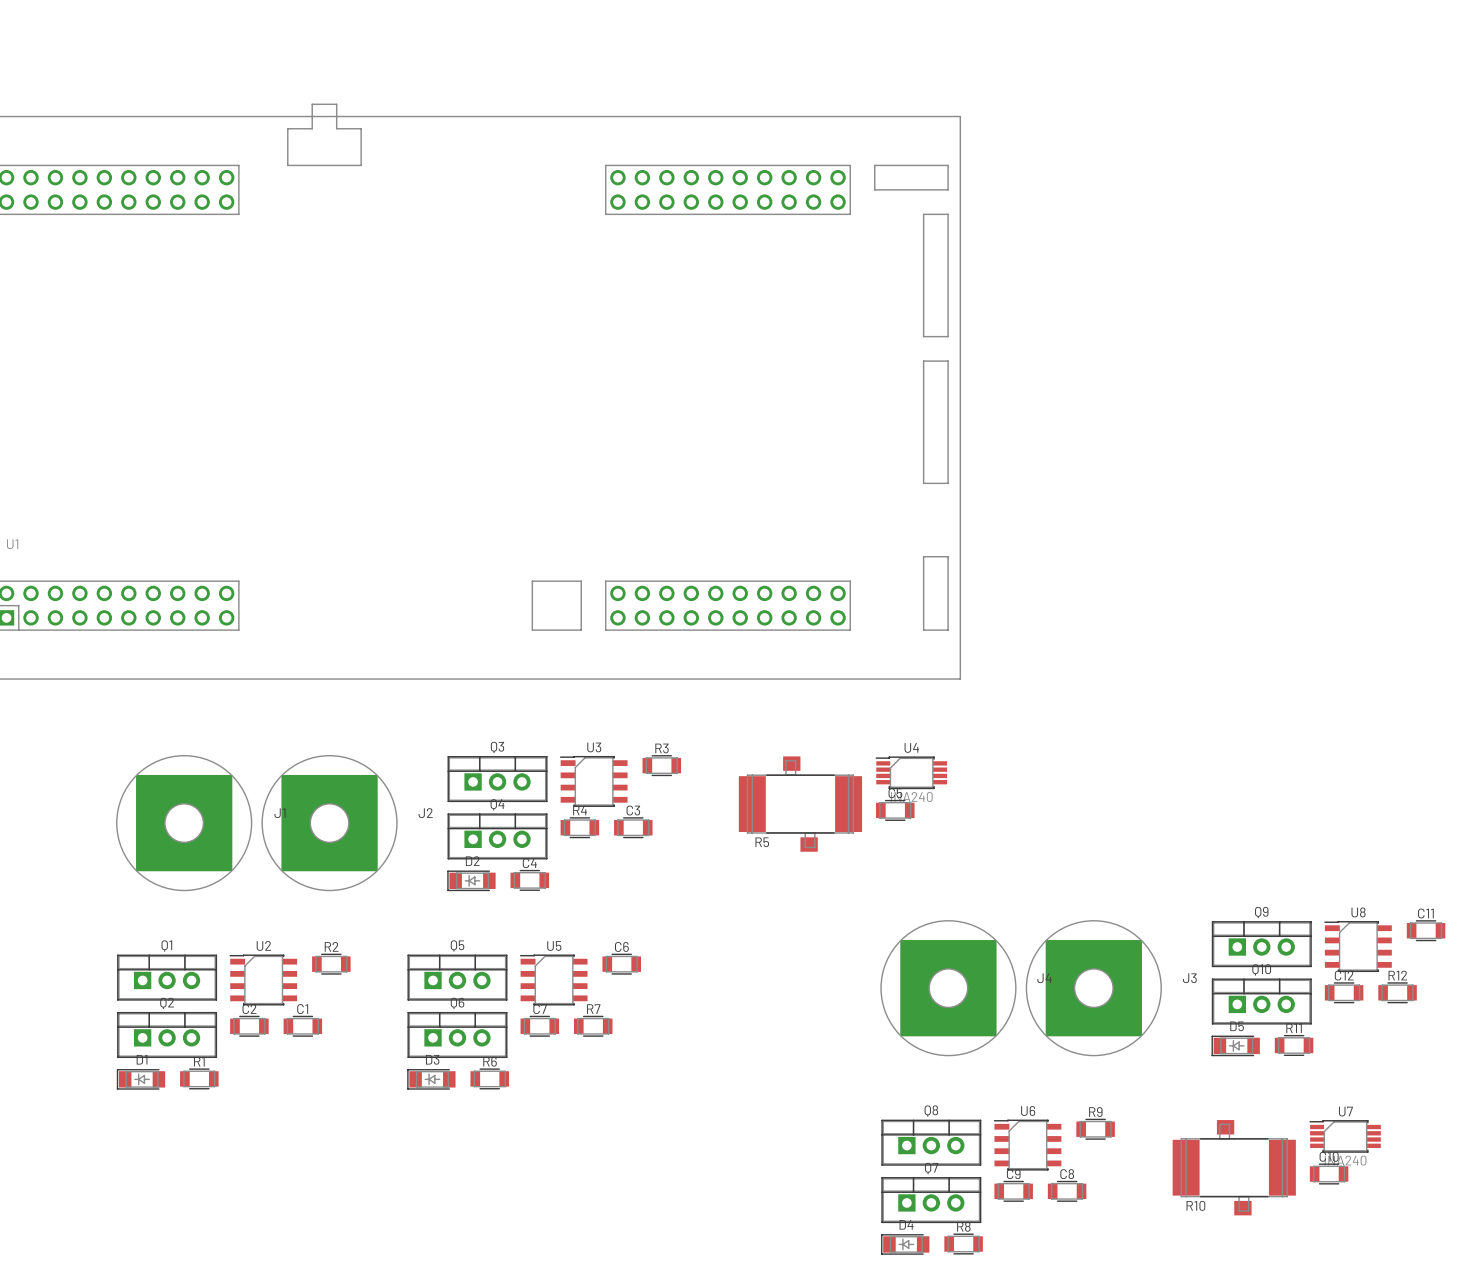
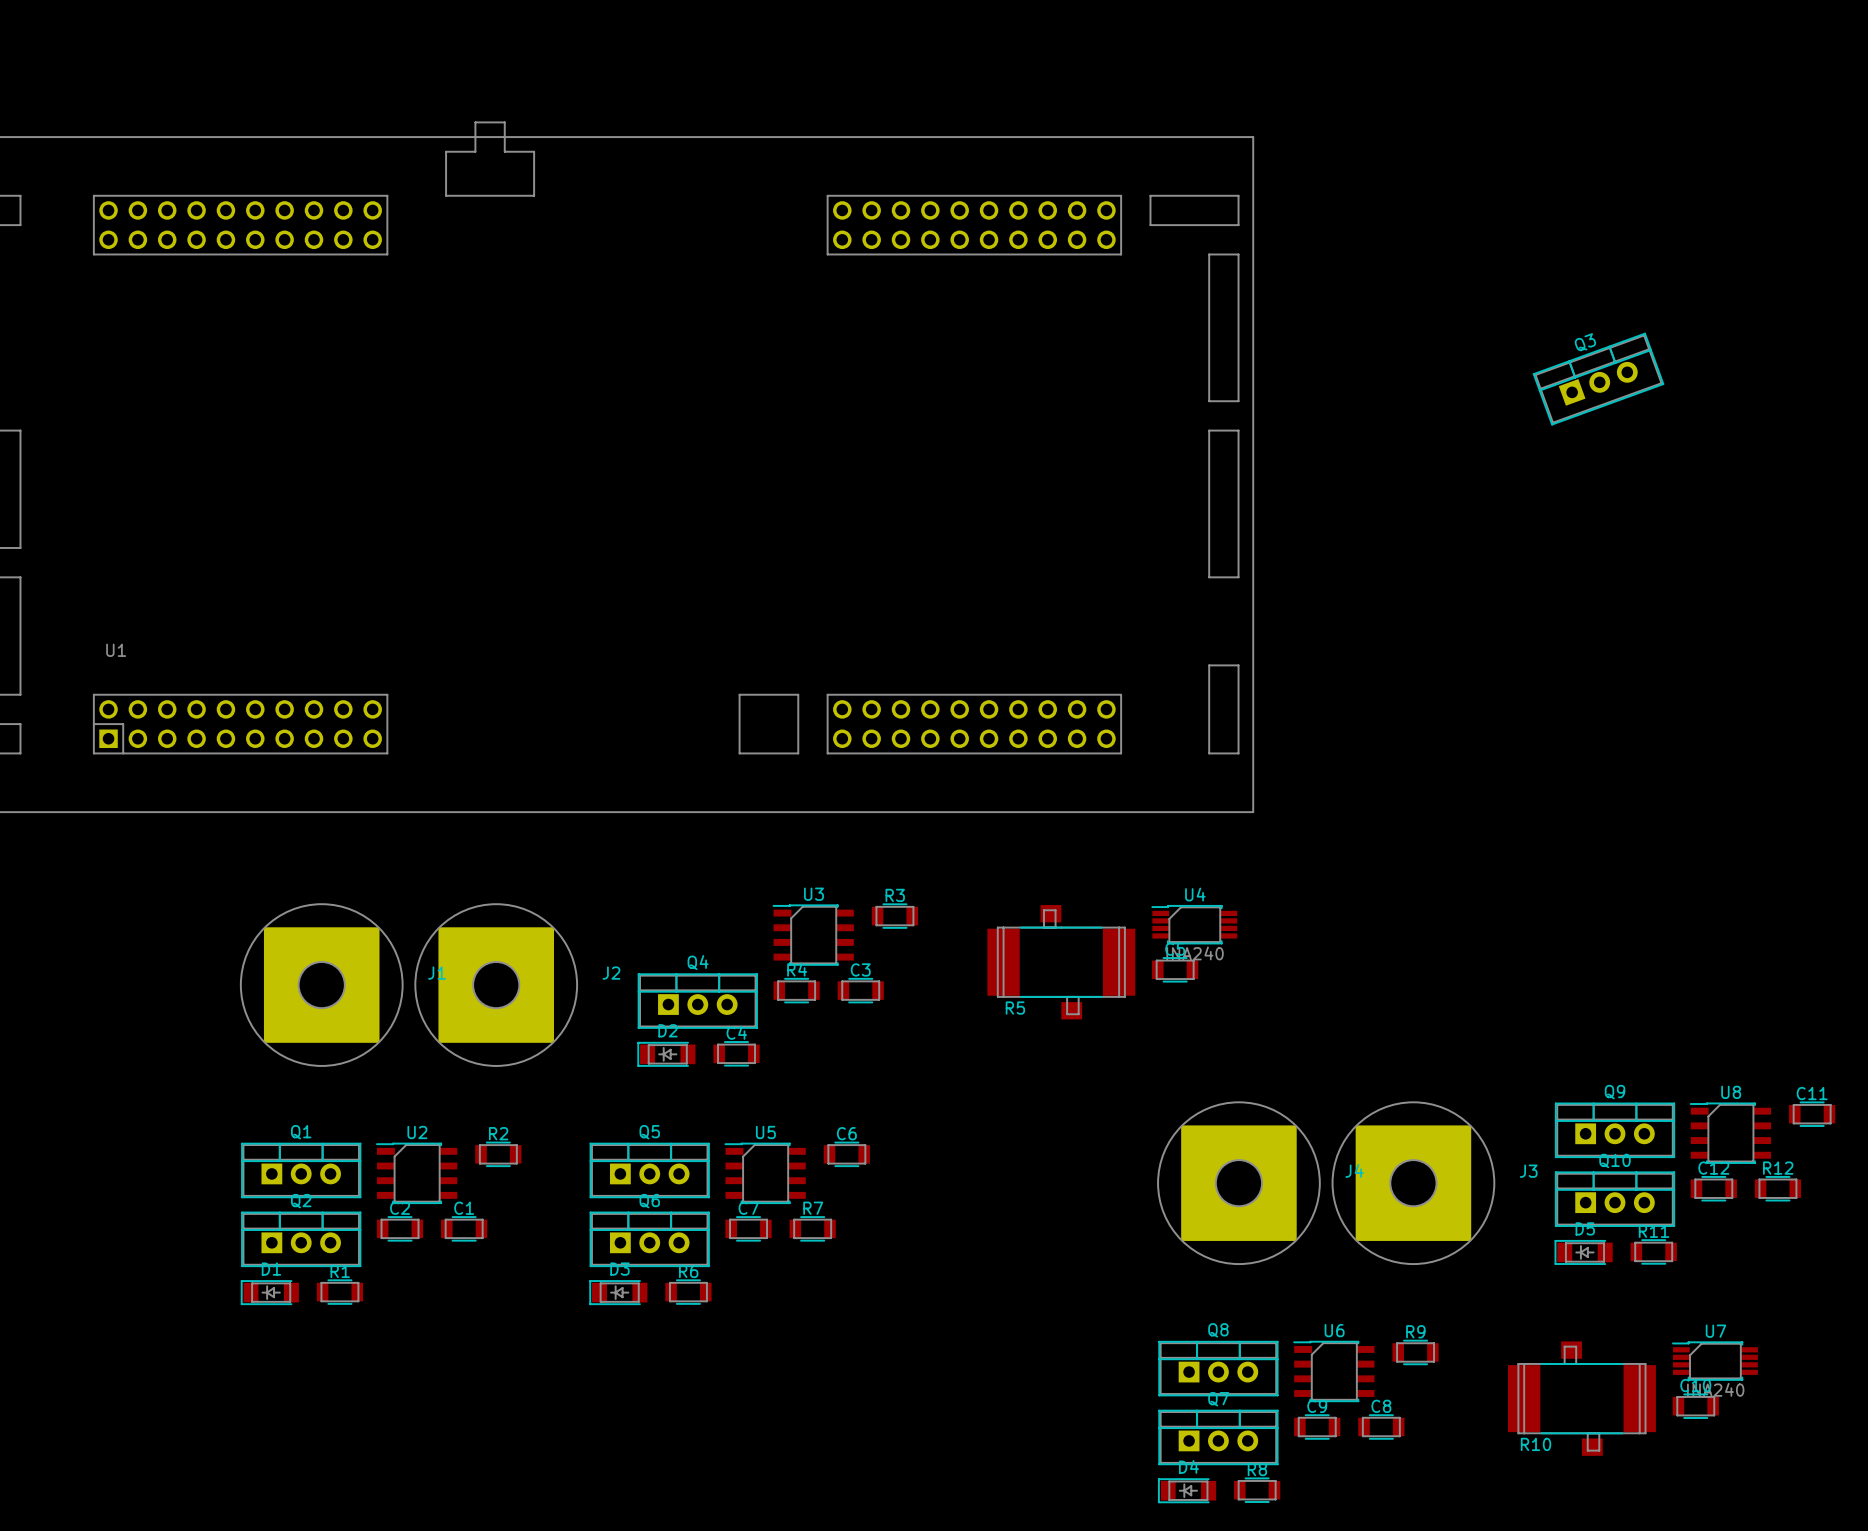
Q3 rotation: 0° (497, 779) -> 20° counterclockwise (1598, 379)
Q3 position: (497, 779) -> (1598, 379)

